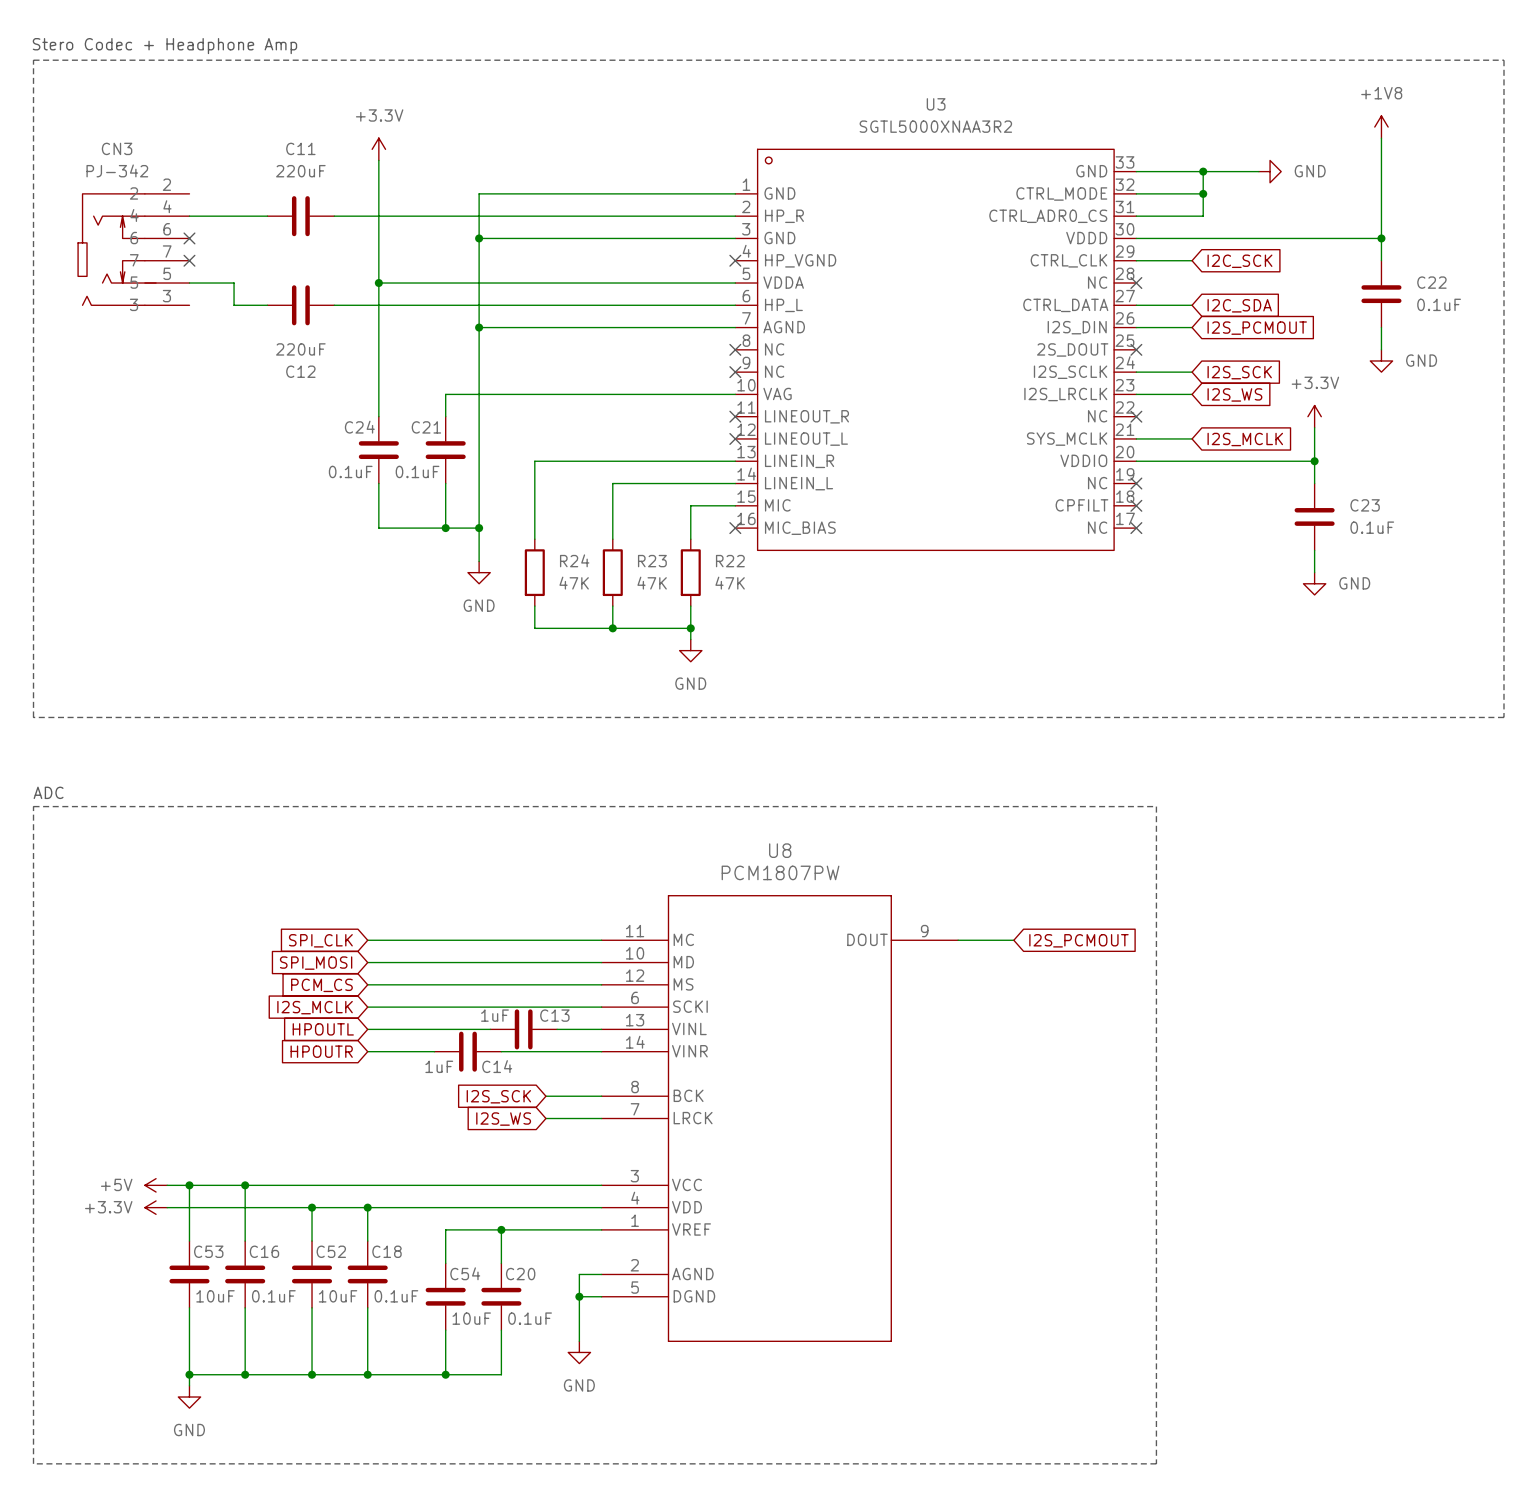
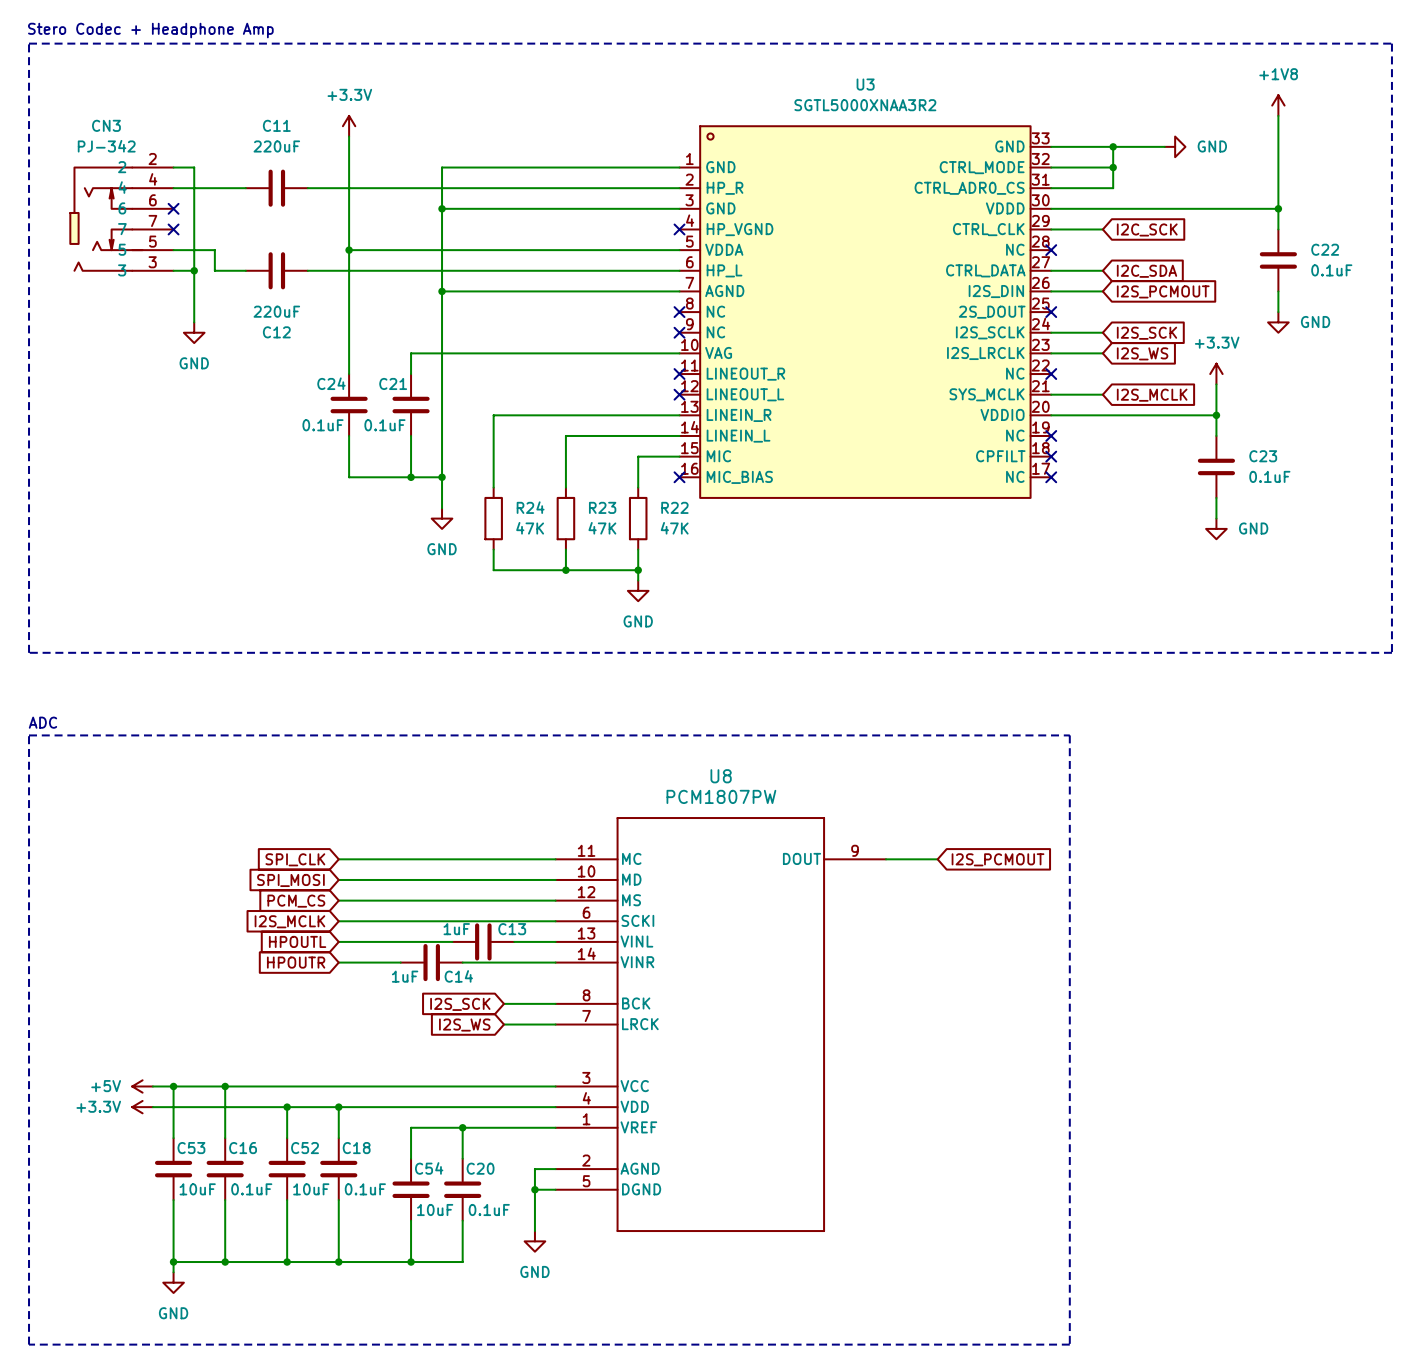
wire: none -> (173, 167) (194, 167) (194, 322)
wire: none -> (173, 270) (194, 270)
junction: none -> (194, 270)
power symbol: none -> GND (194, 332)

